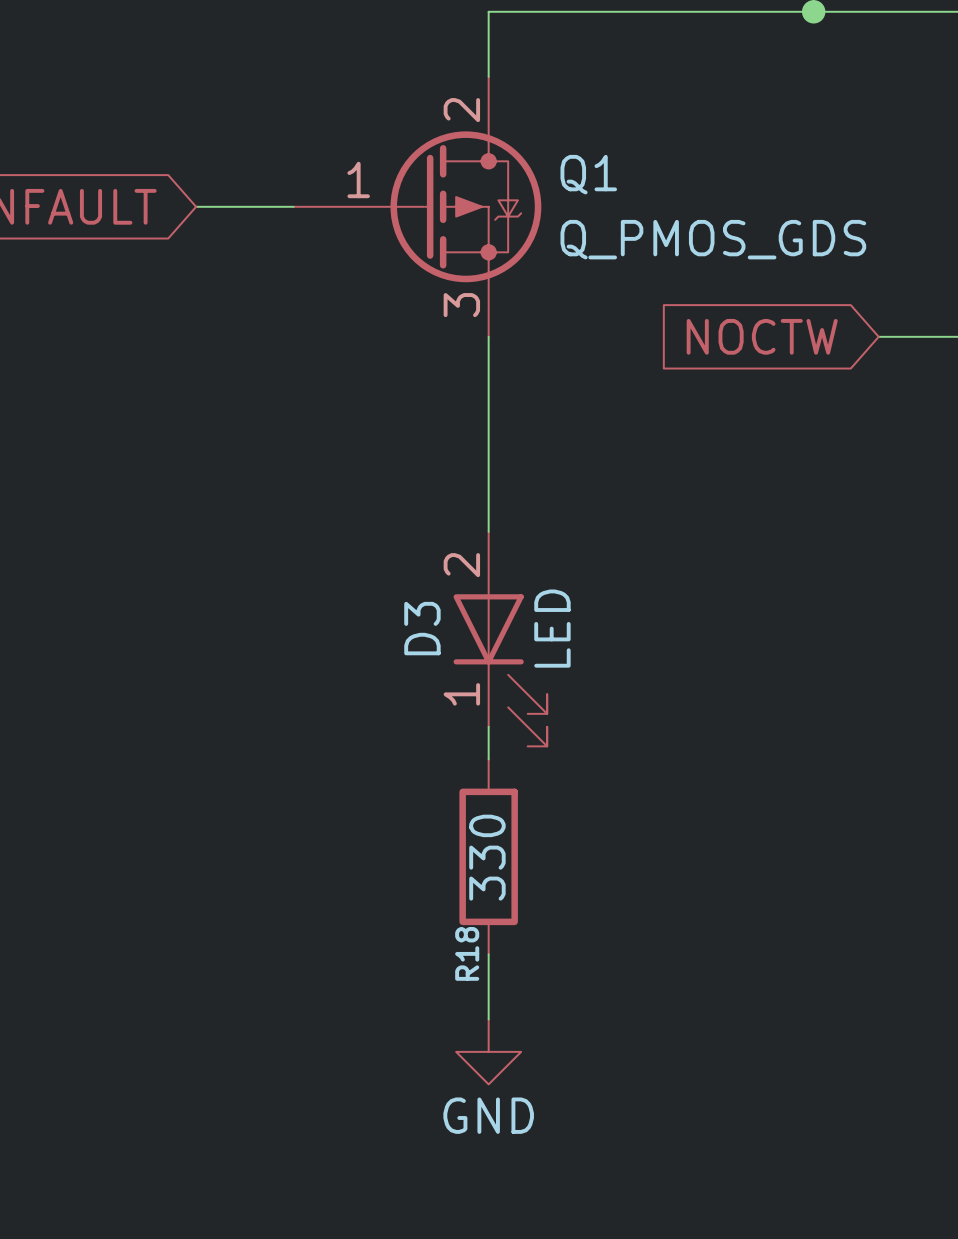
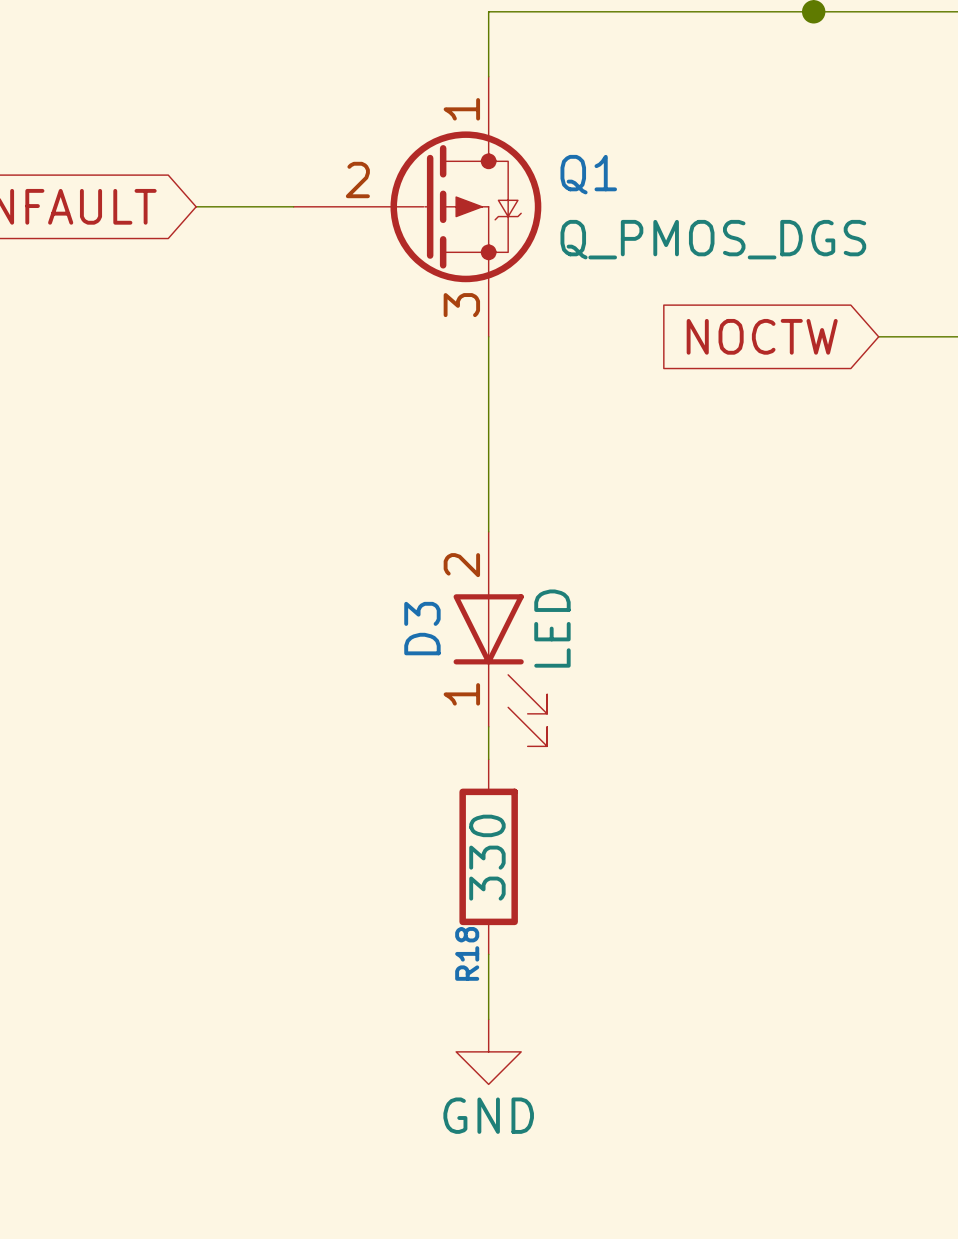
Q1 pin number: 2 (461, 110) -> 1 (461, 109)
Q1 pin number: 1 (358, 180) -> 2 (357, 180)
Q1 value: Q_PMOS_GDS (713, 239) -> Q_PMOS_DGS (713, 239)

